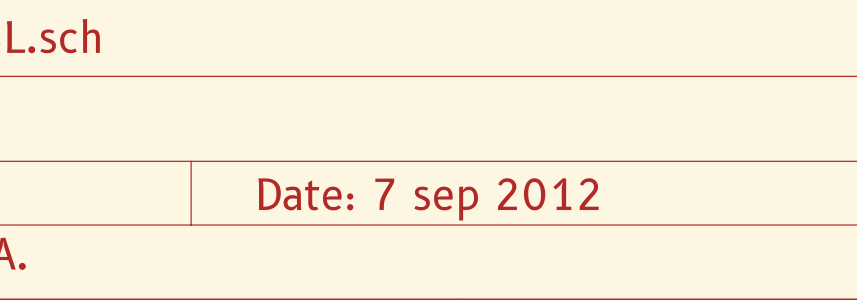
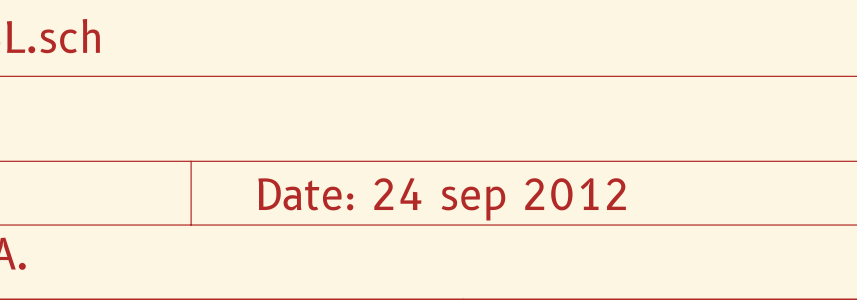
title block: Date: 7 sep 2012 (428, 199) -> Date: 24 sep 2012 (442, 199)

